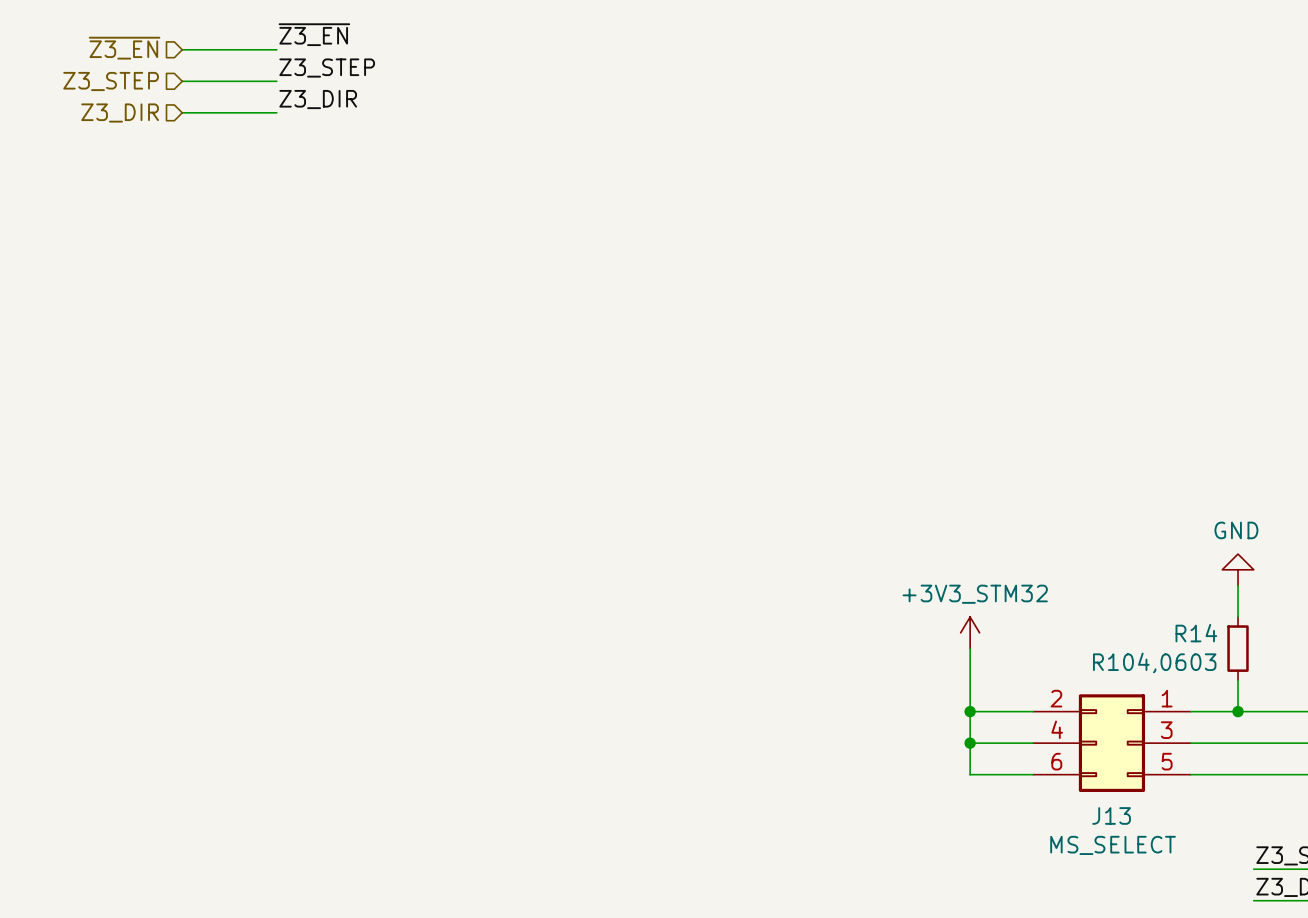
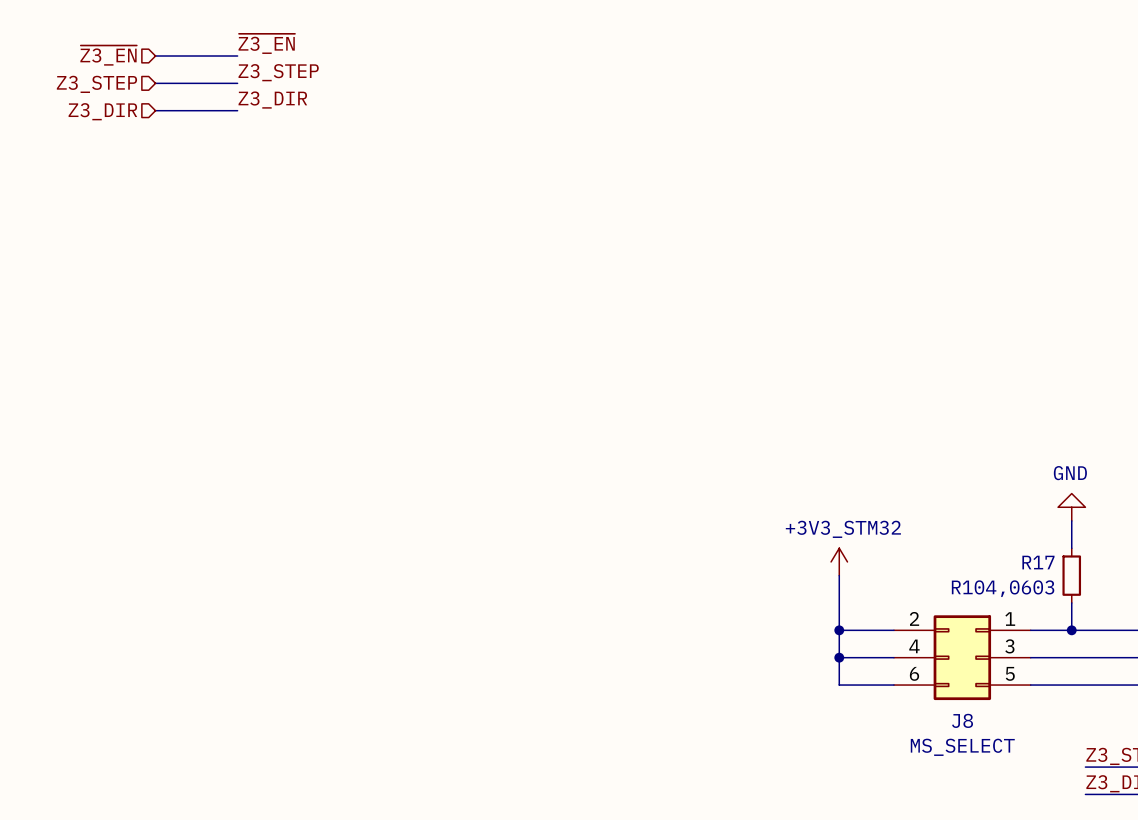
R14 name: R14 (1196, 633) -> R17 (1038, 562)
J13 name: J13 (1111, 815) -> J8 (962, 720)

